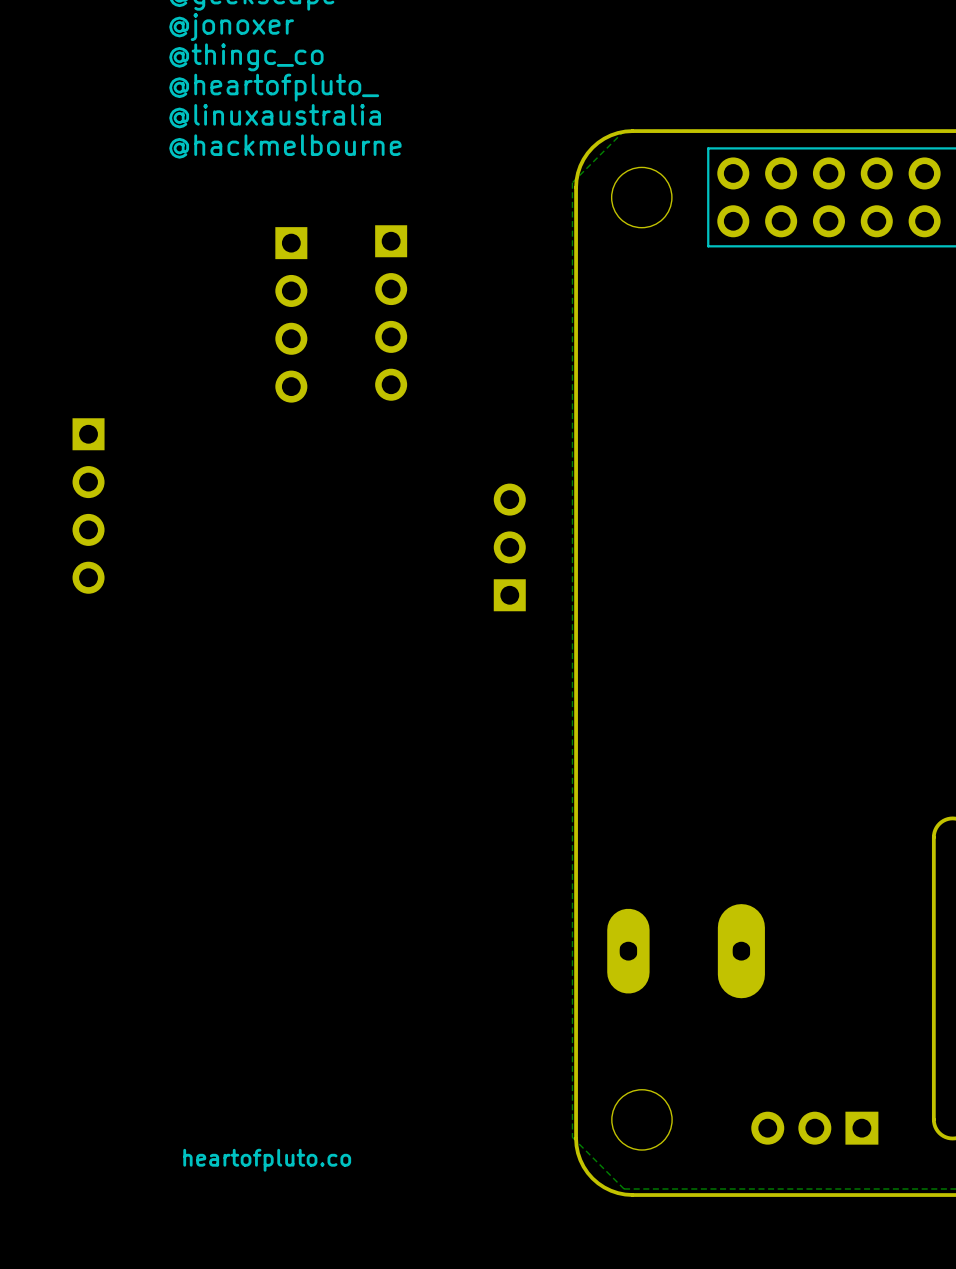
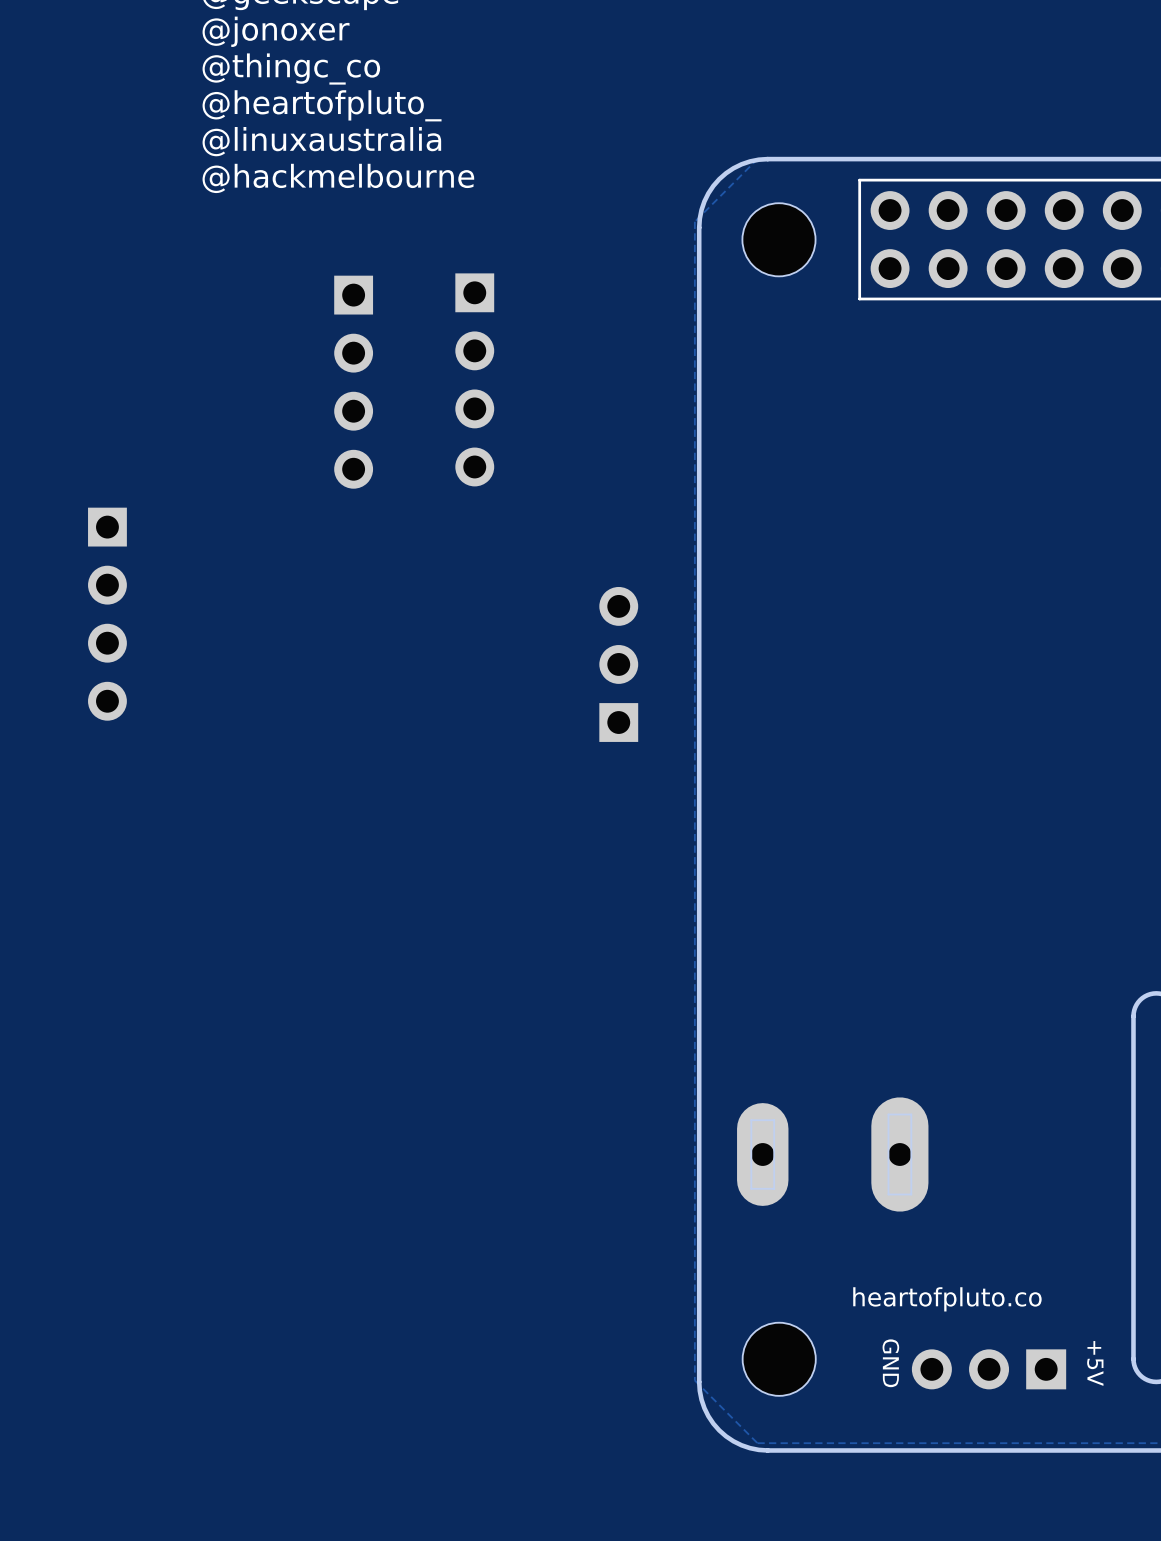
text: none -> heartofpluto.co (947, 1299)
text: none -> GND (890, 1363)
text: none -> +5V (1095, 1363)
text: heartofpluto.co (267, 1160) -> none

